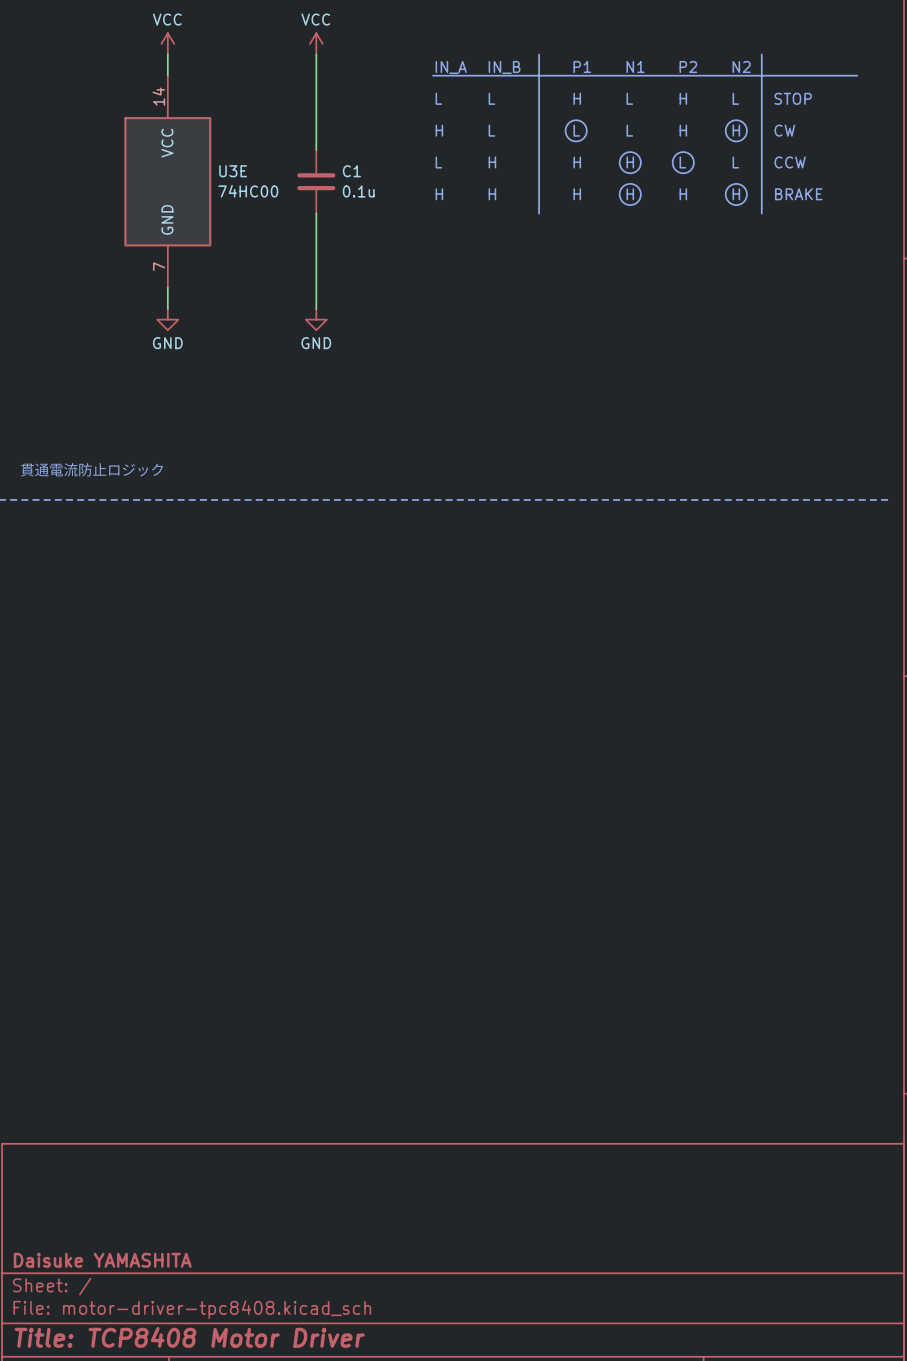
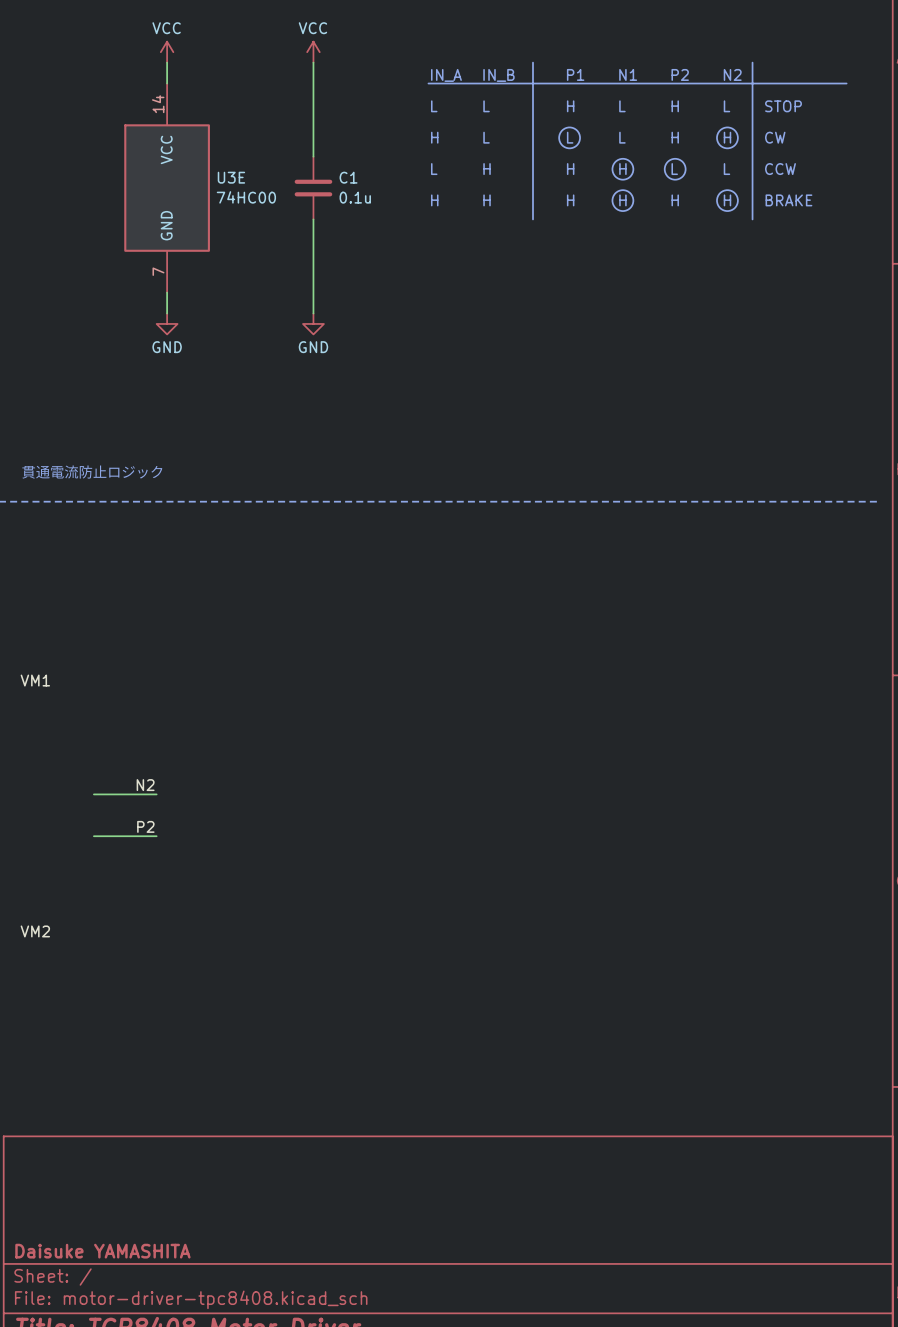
label: none -> VM1 (35, 680)
label: none -> N2 (145, 785)
wire: none -> (93, 794) (156, 794)
label: none -> P2 (145, 826)
wire: none -> (93, 836) (156, 836)
label: none -> VM2 (35, 931)

